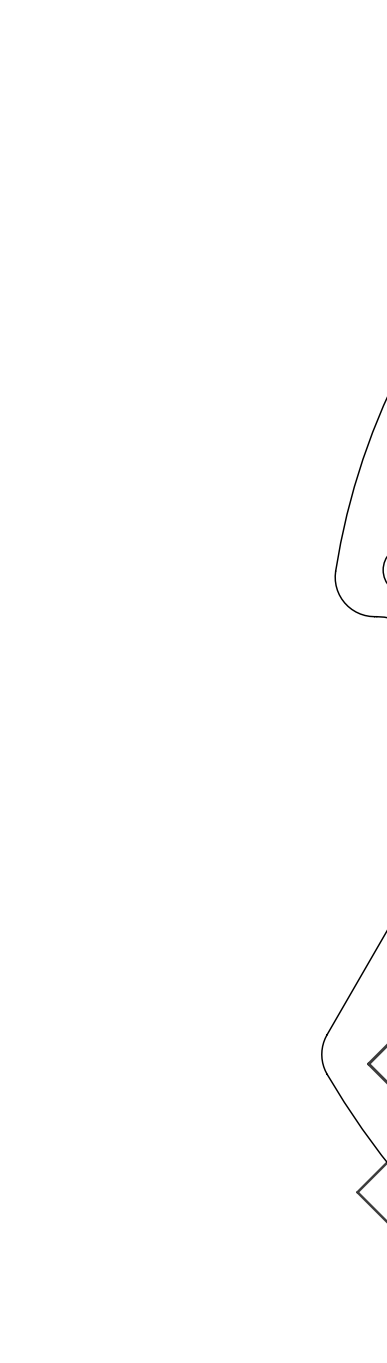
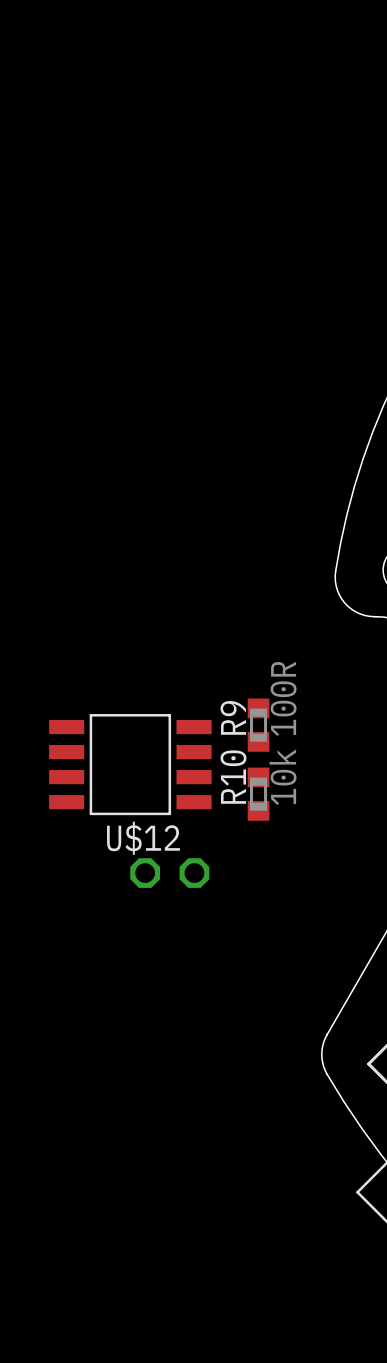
R9: none -> 100R (258, 725)
U$12: none -> (130, 764)
R10: none -> 10k (258, 794)
part: none -> (169, 873)

